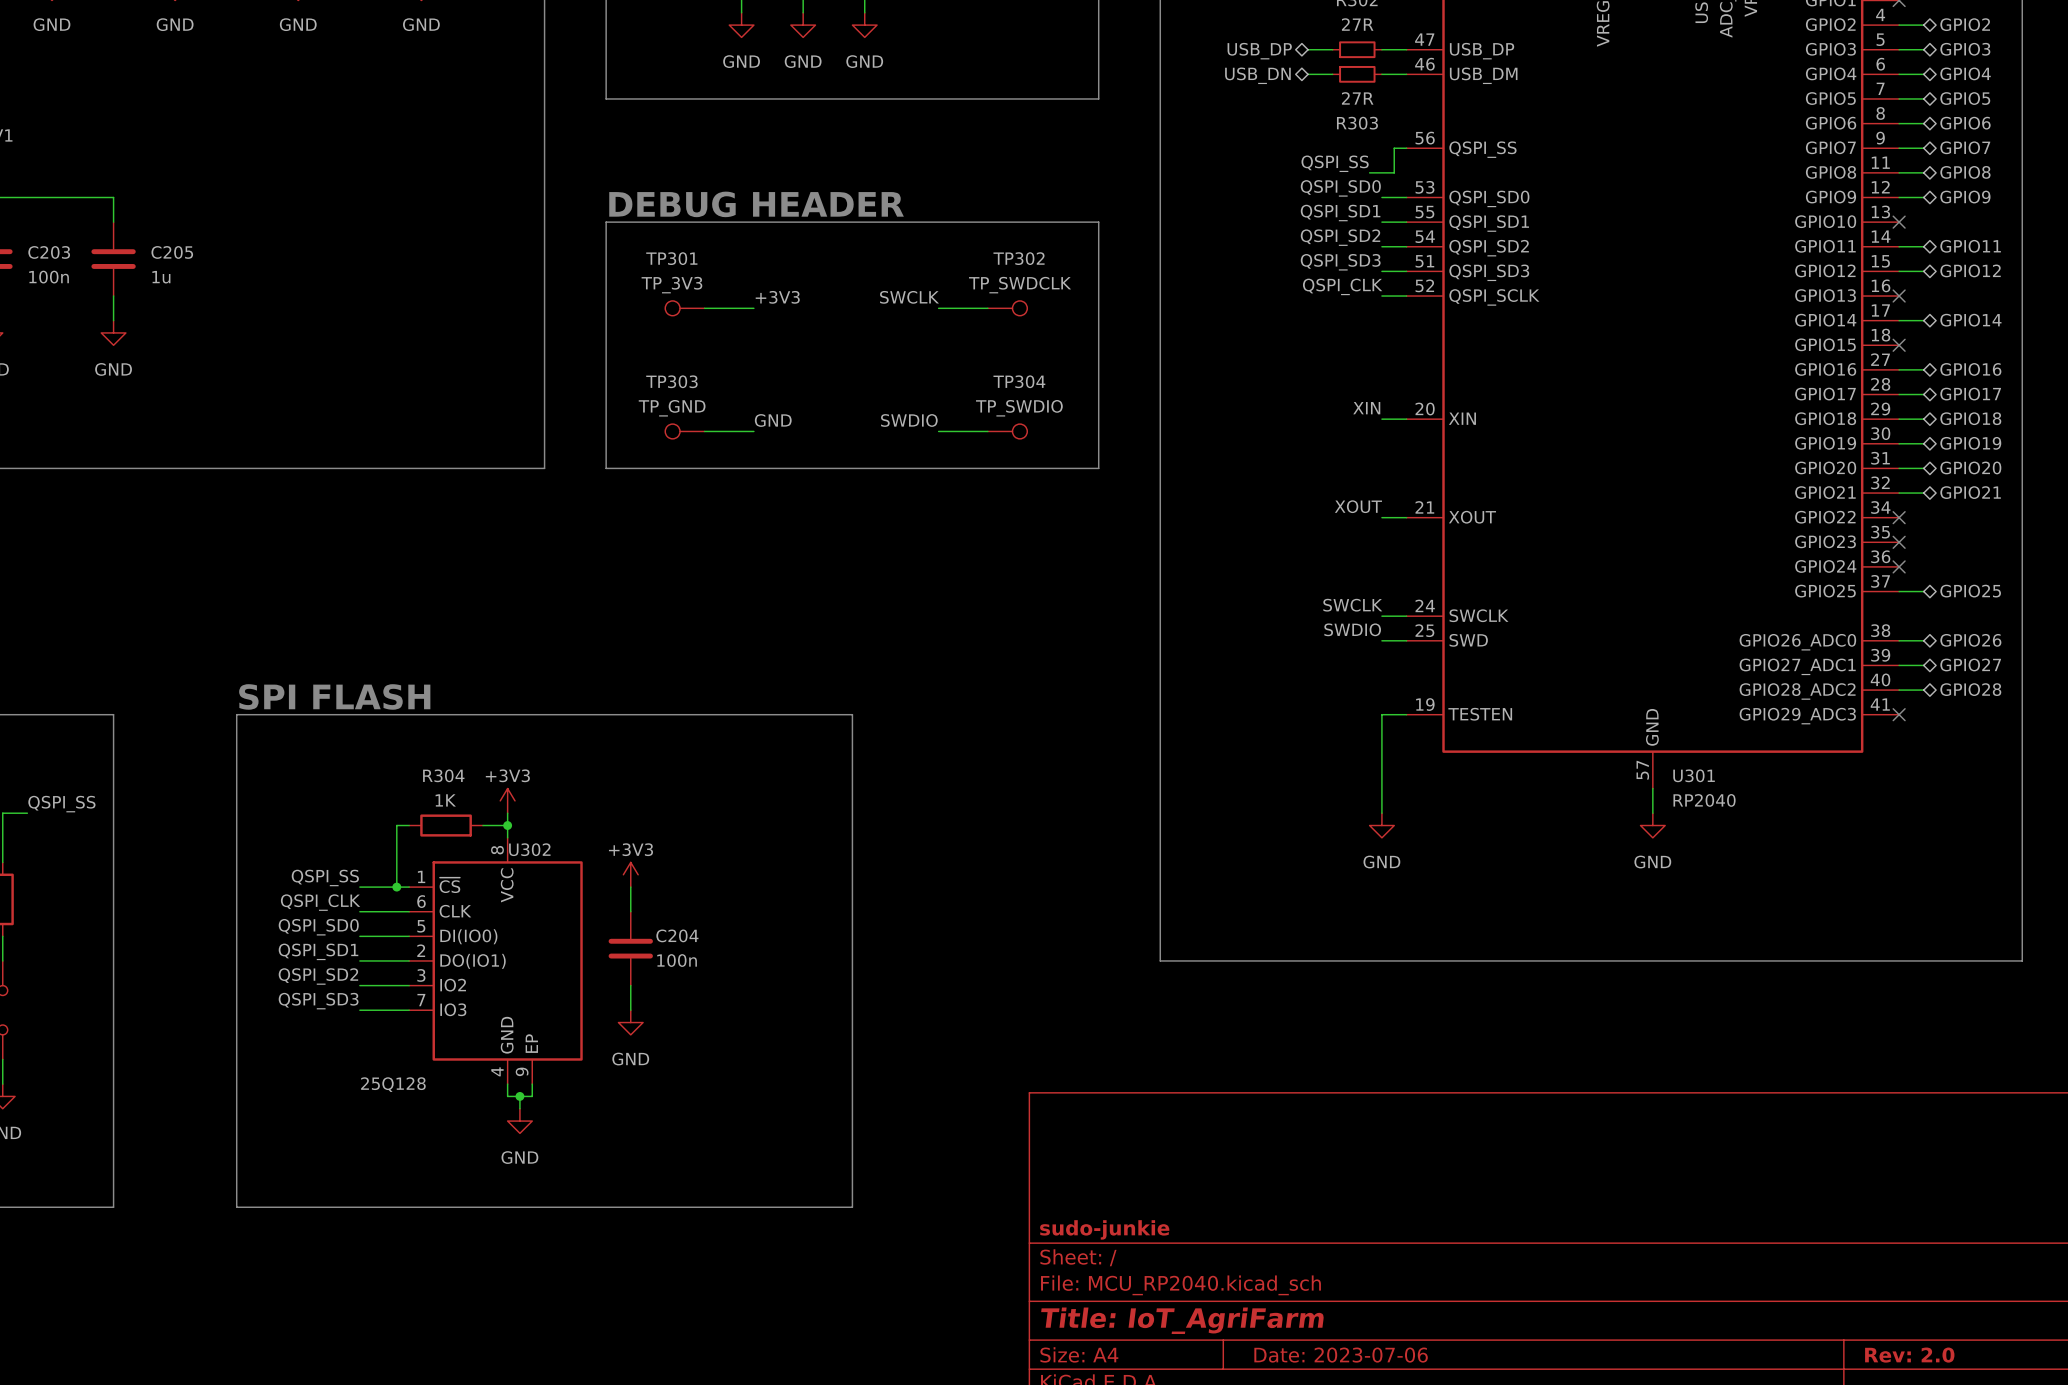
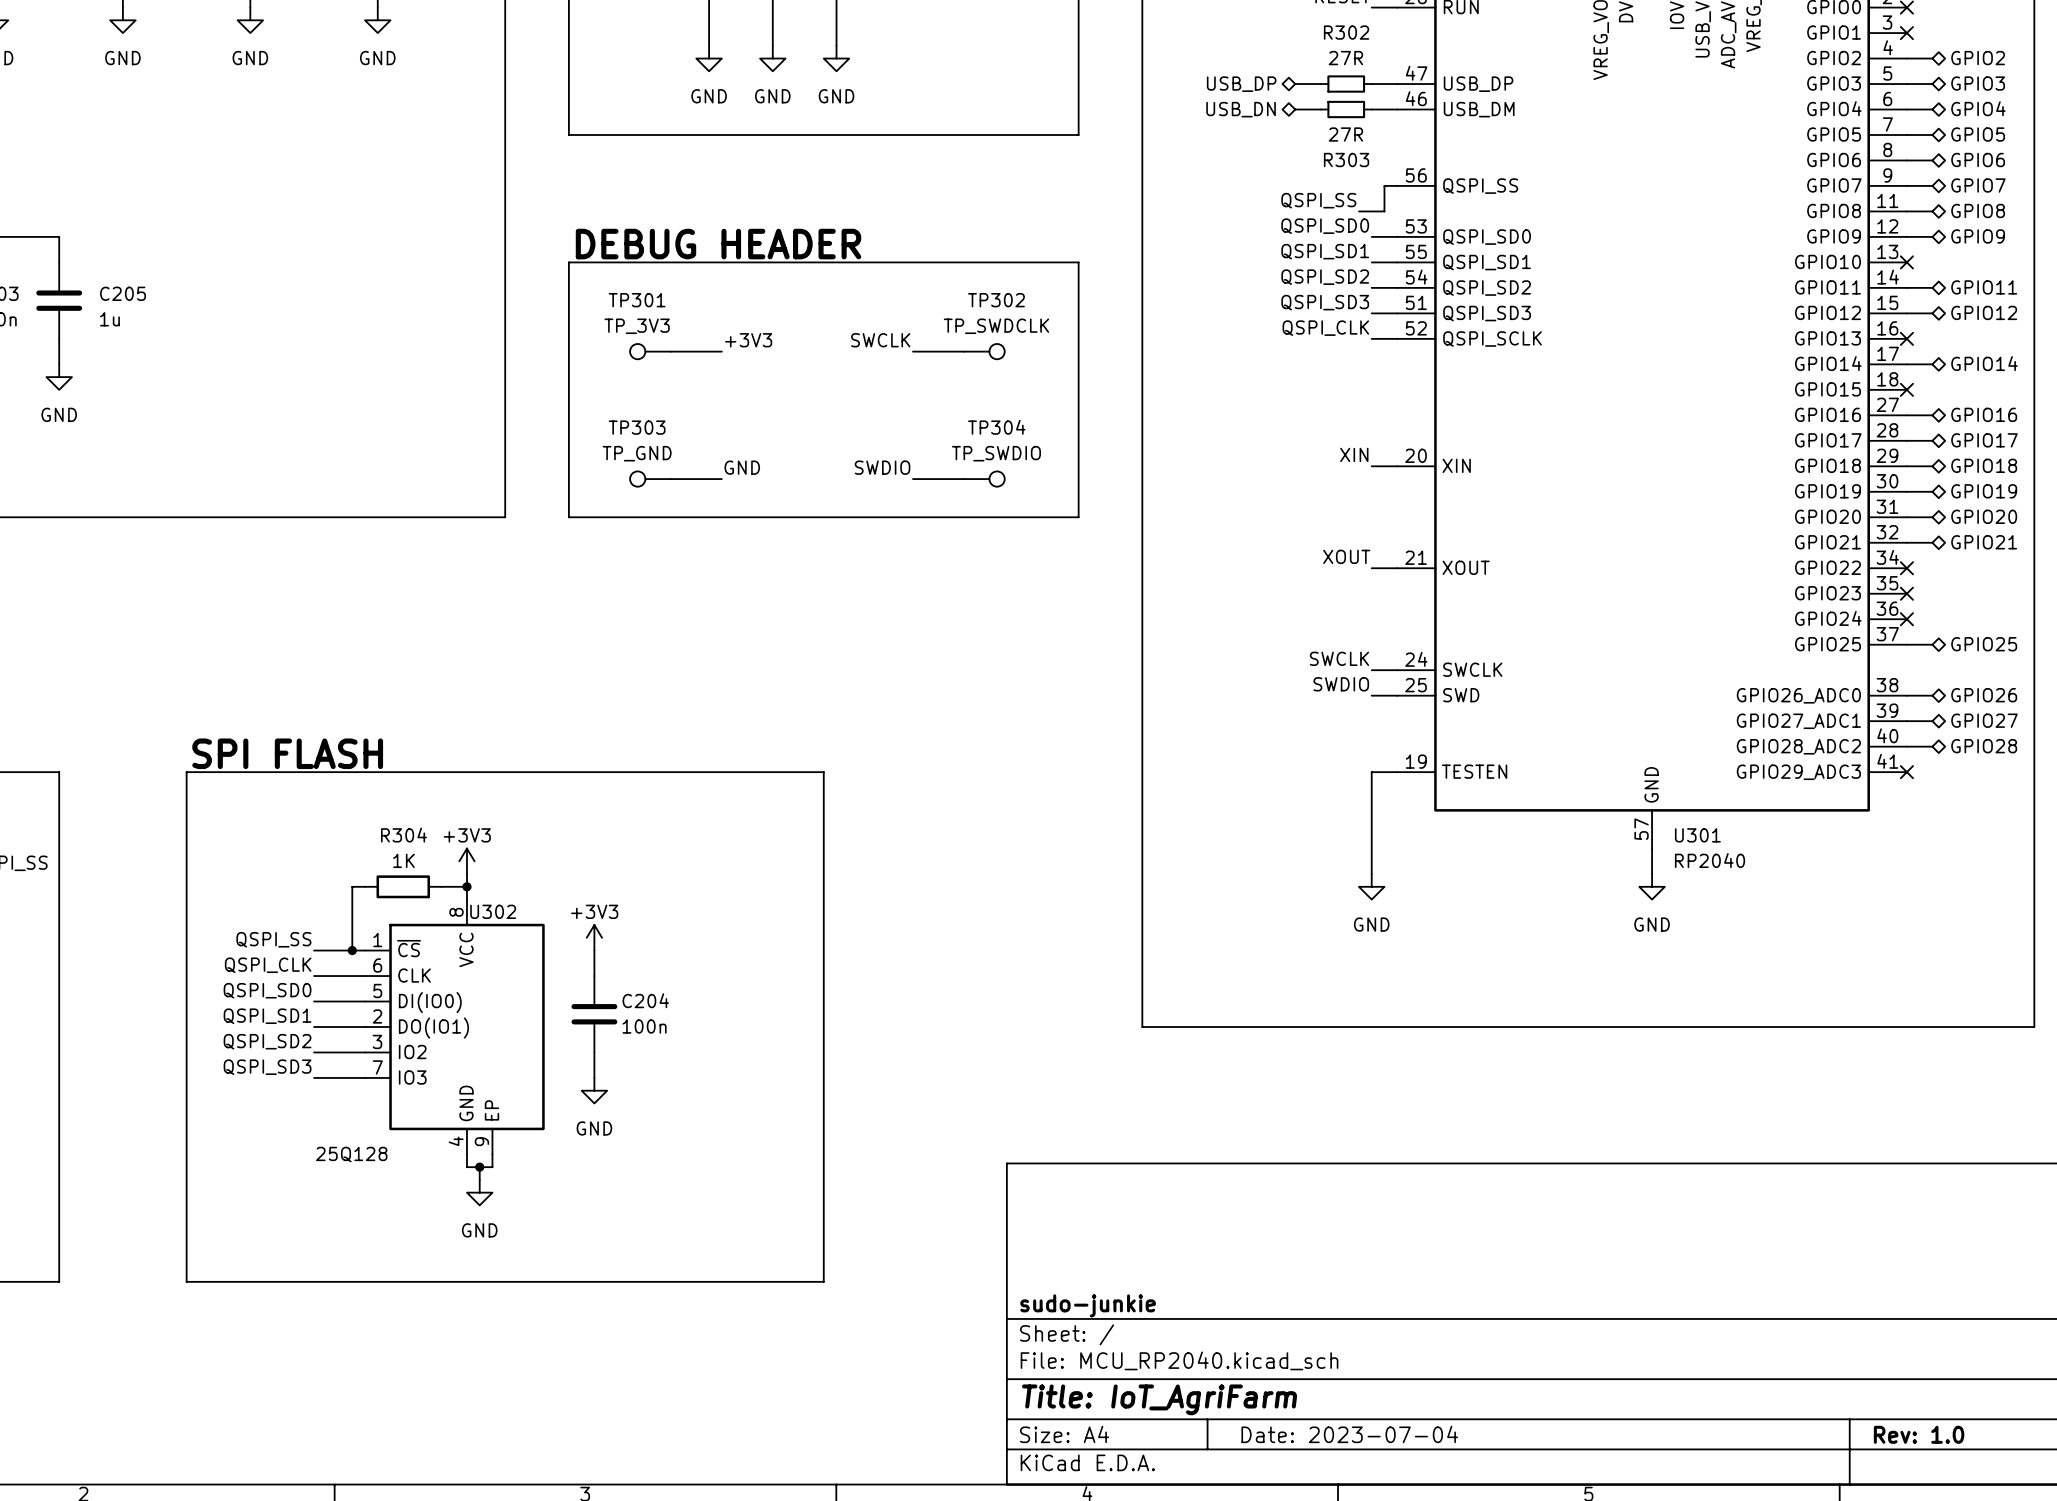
title block: Date: 2023-07-06 (1341, 1355) -> Date: 2023-07-04 (1349, 1434)
title block: Rev: 2.0 (1909, 1355) -> Rev: 1.0 (1919, 1434)

